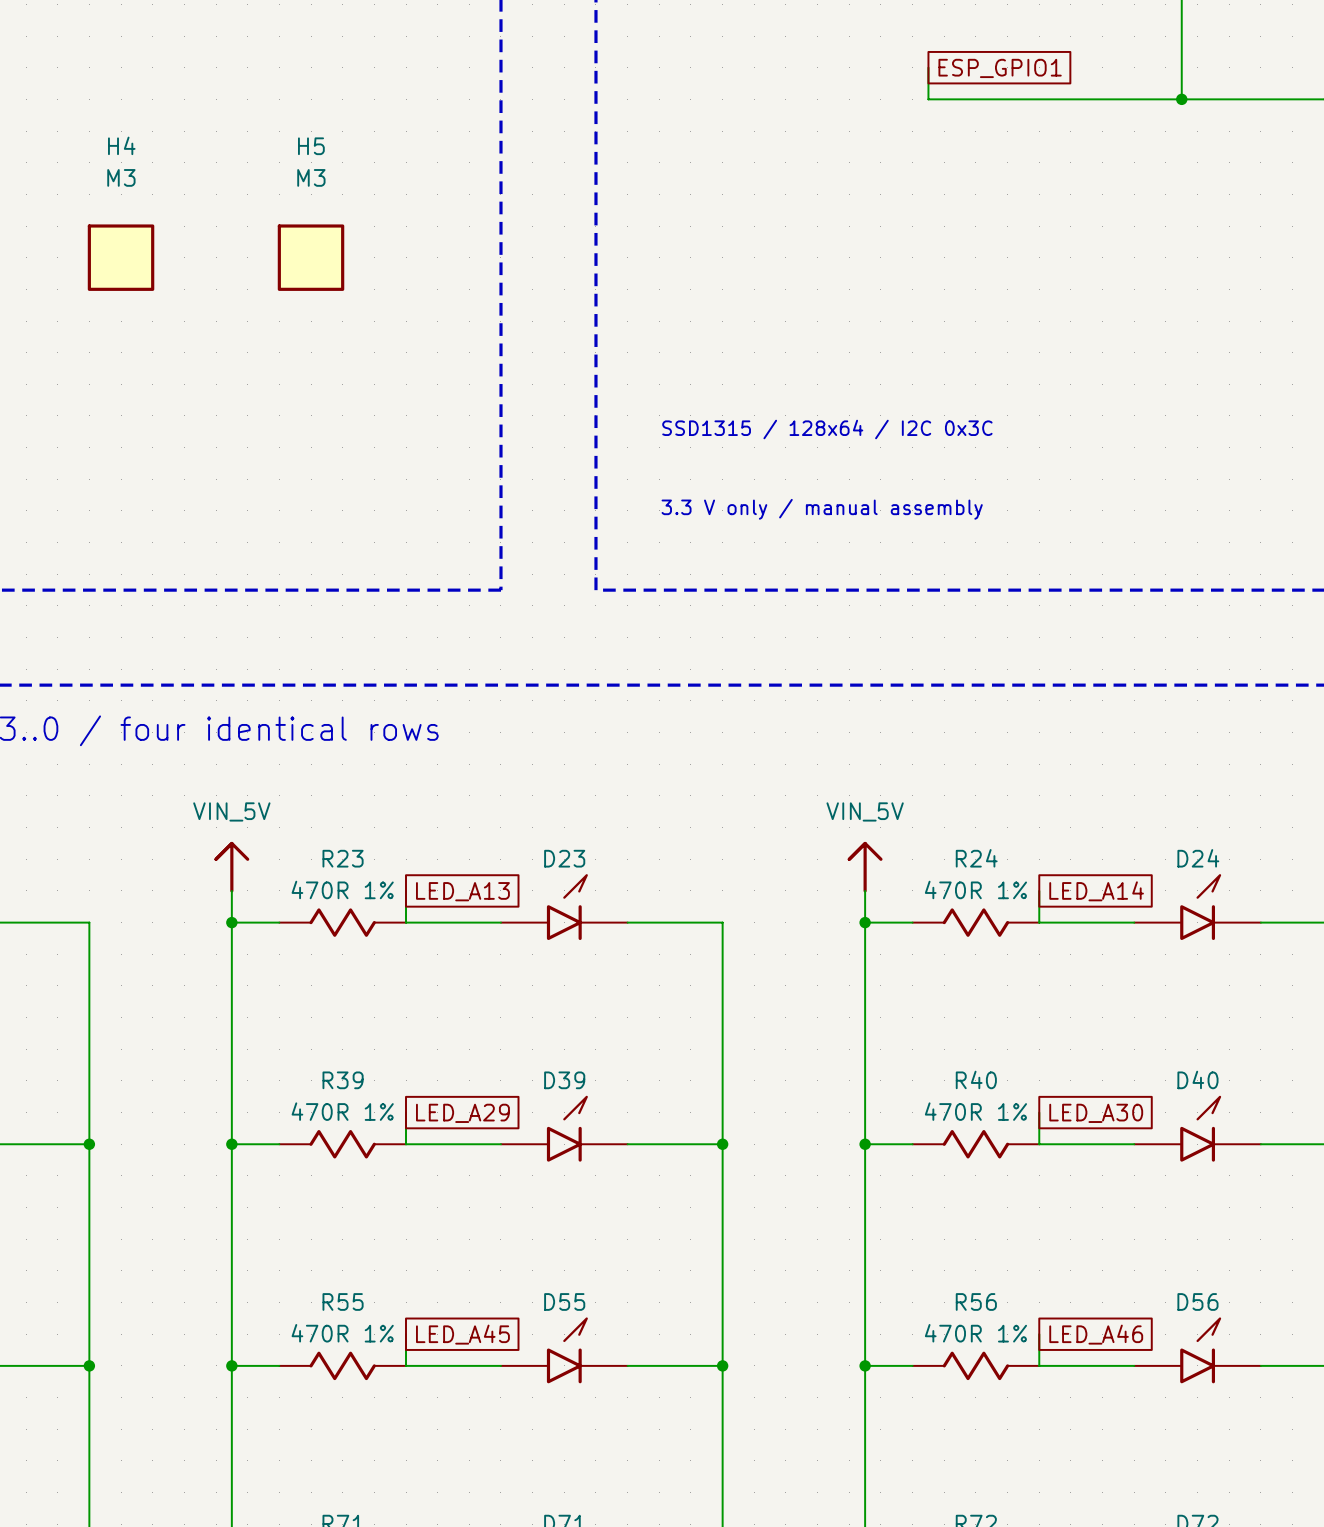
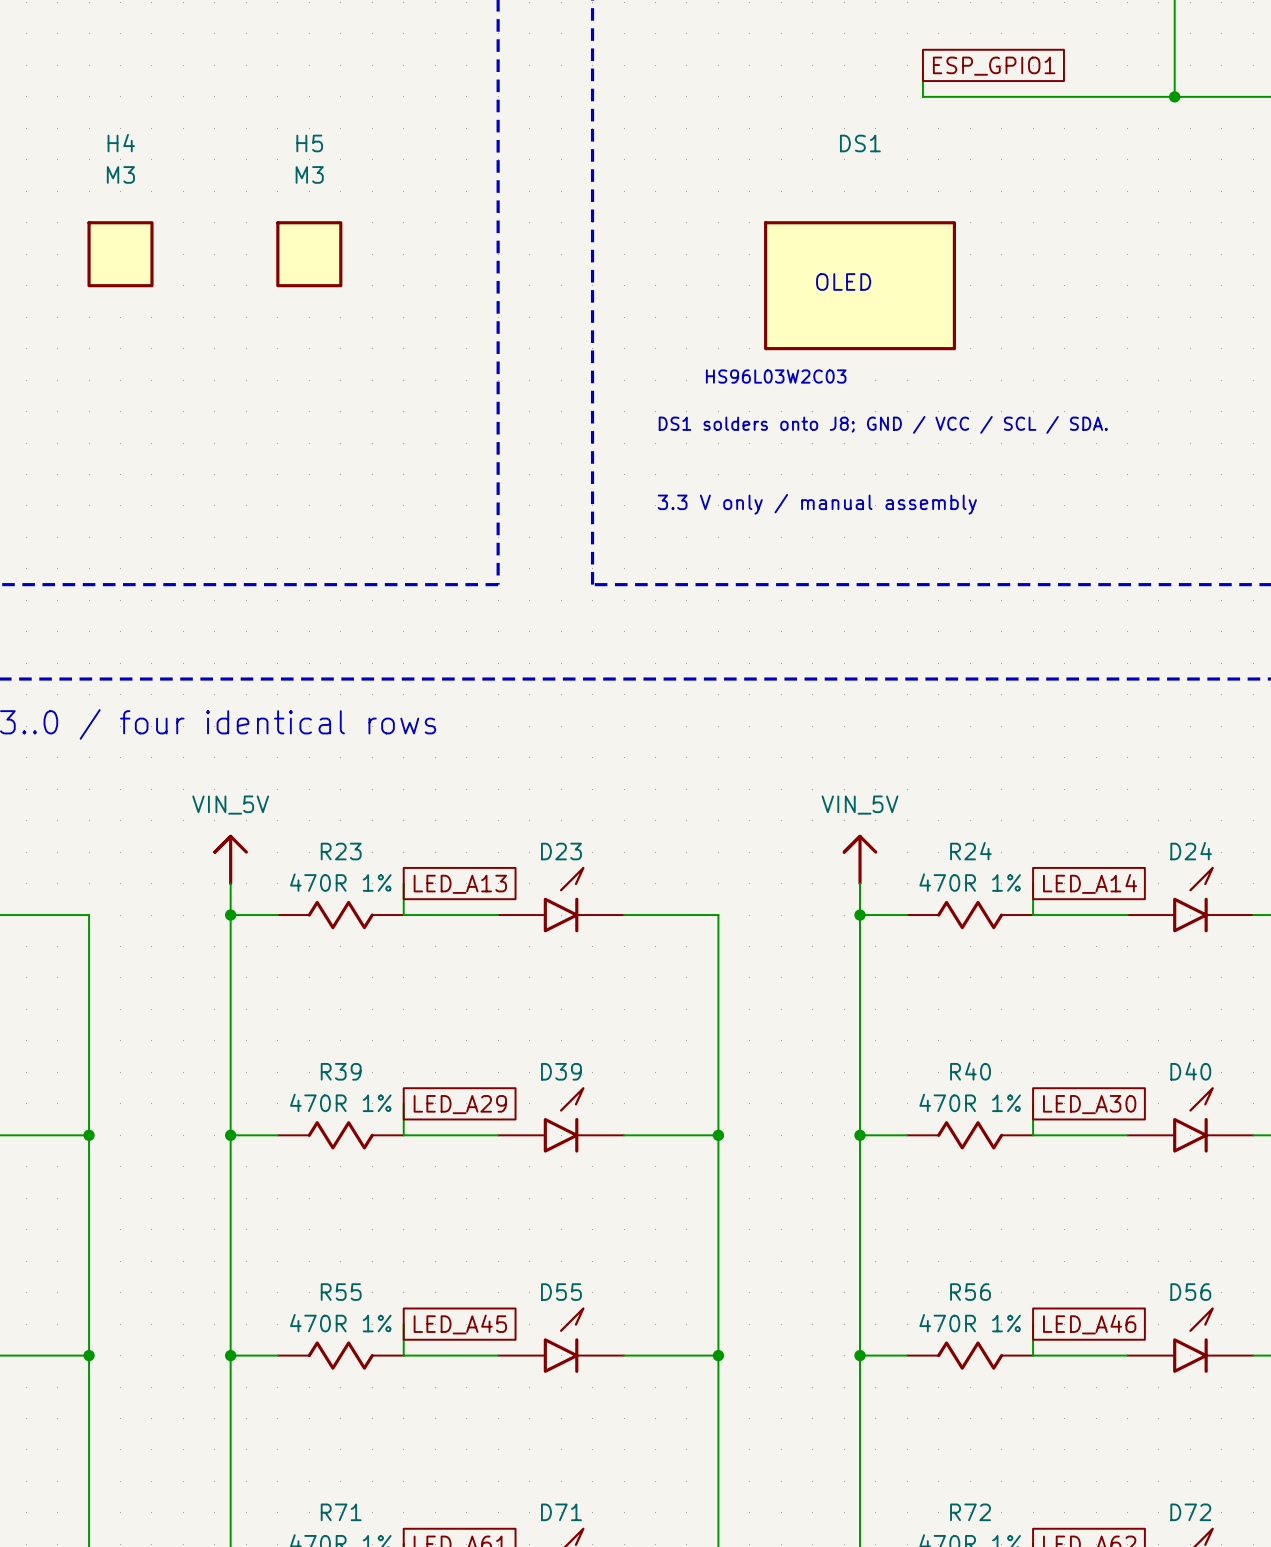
text: none -> OLED (843, 281)
DS1: none -> (860, 285)
text: none -> HS96L03W2C03 (776, 376)
text: SSD1315 / 128x64 / I2C 0x3C (827, 429) -> DS1 solders onto J8; GND / VCC / SCL / SDA. (883, 424)

